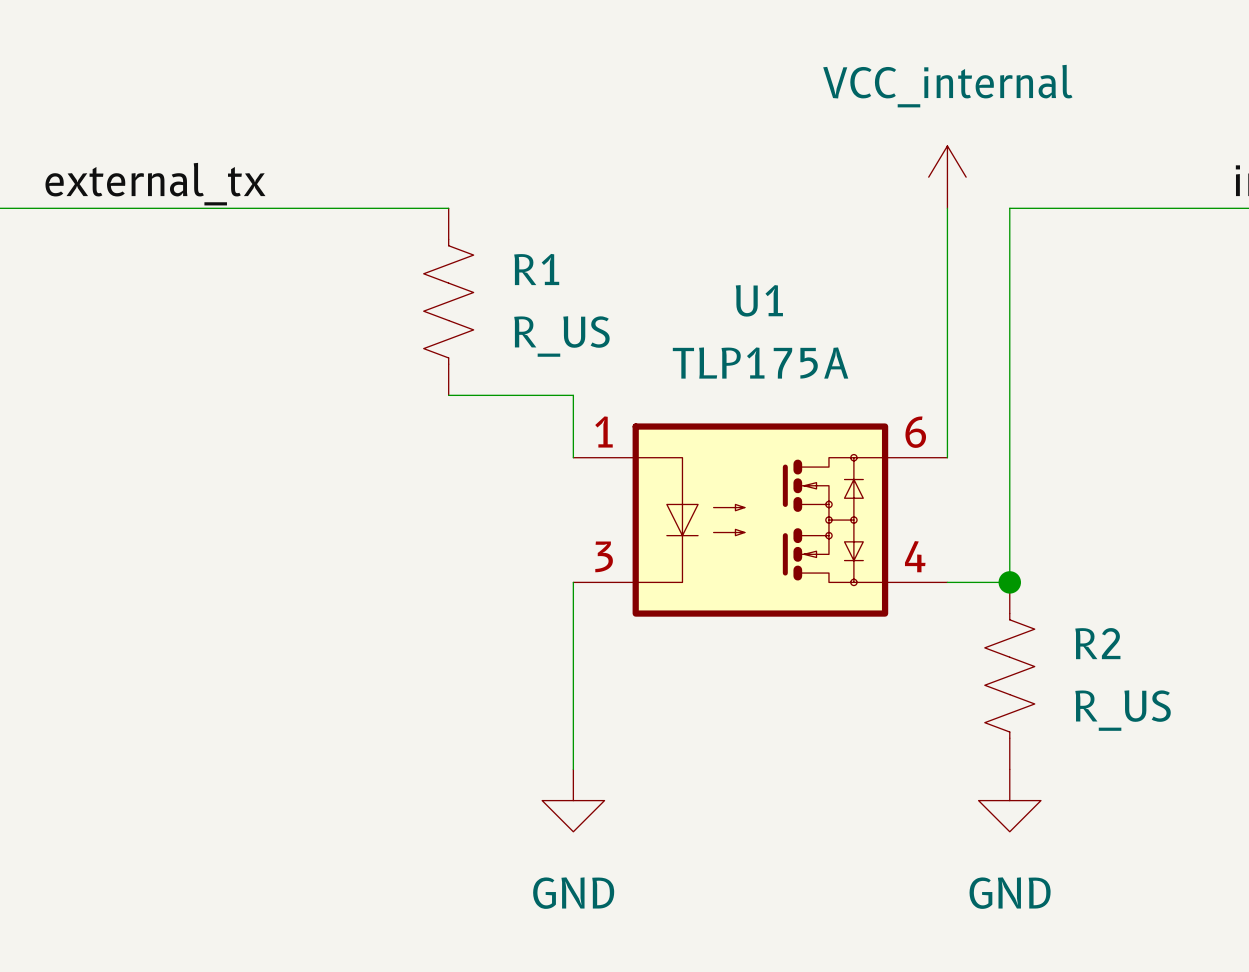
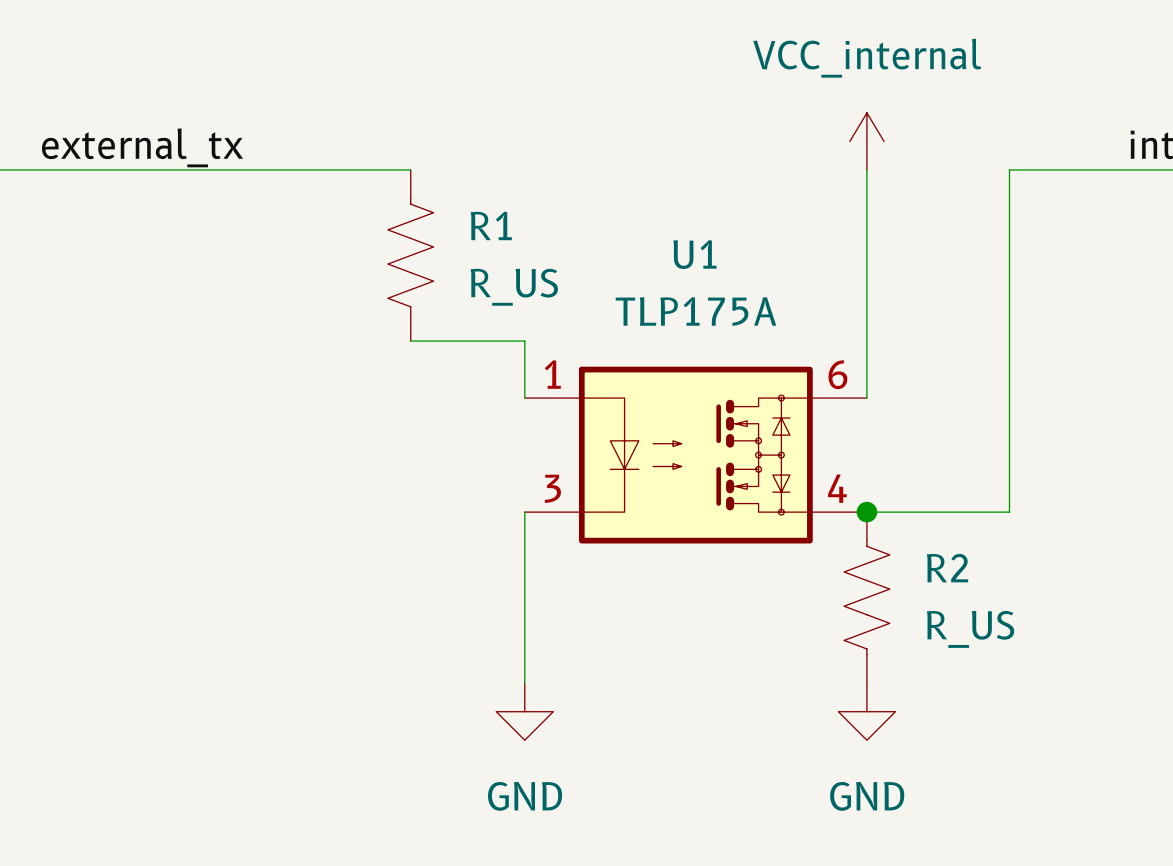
wire: (1103, 208) (1009, 208) (1009, 582) -> (1009, 169) (1009, 512) (923, 512)
junction position: (1009, 582) -> (866, 512)
R2 position: (1009, 675) -> (866, 597)
power symbol position: GND (1009, 800) -> GND (866, 711)

